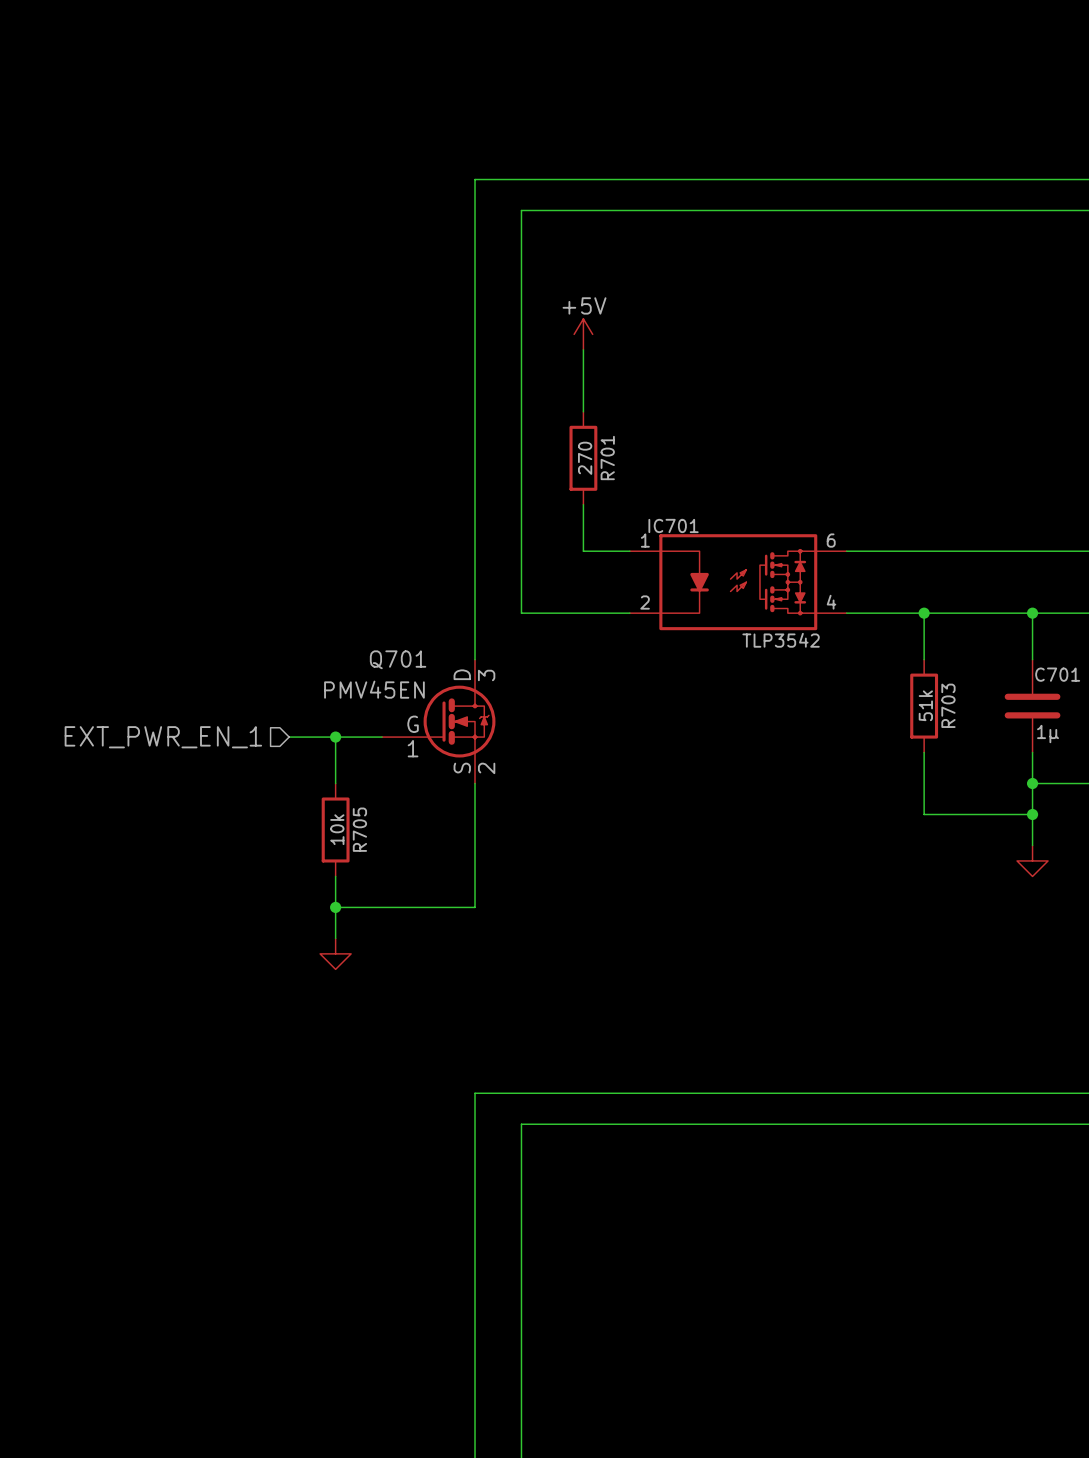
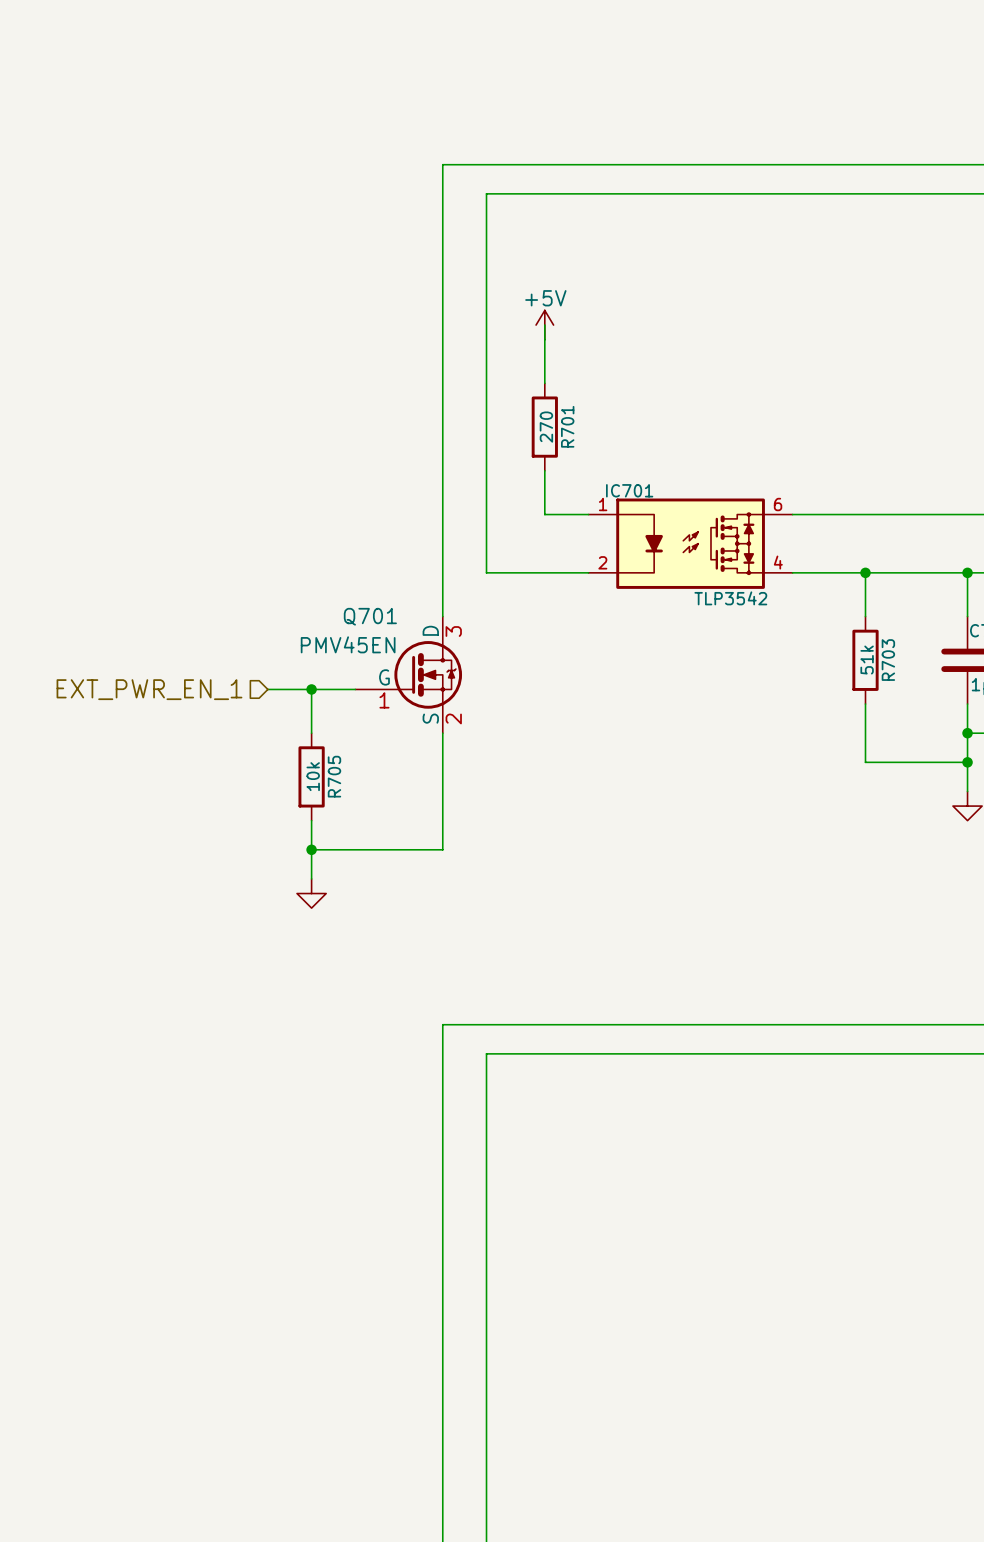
power symbol position: +5V (583, 334) -> +5V (544, 325)

